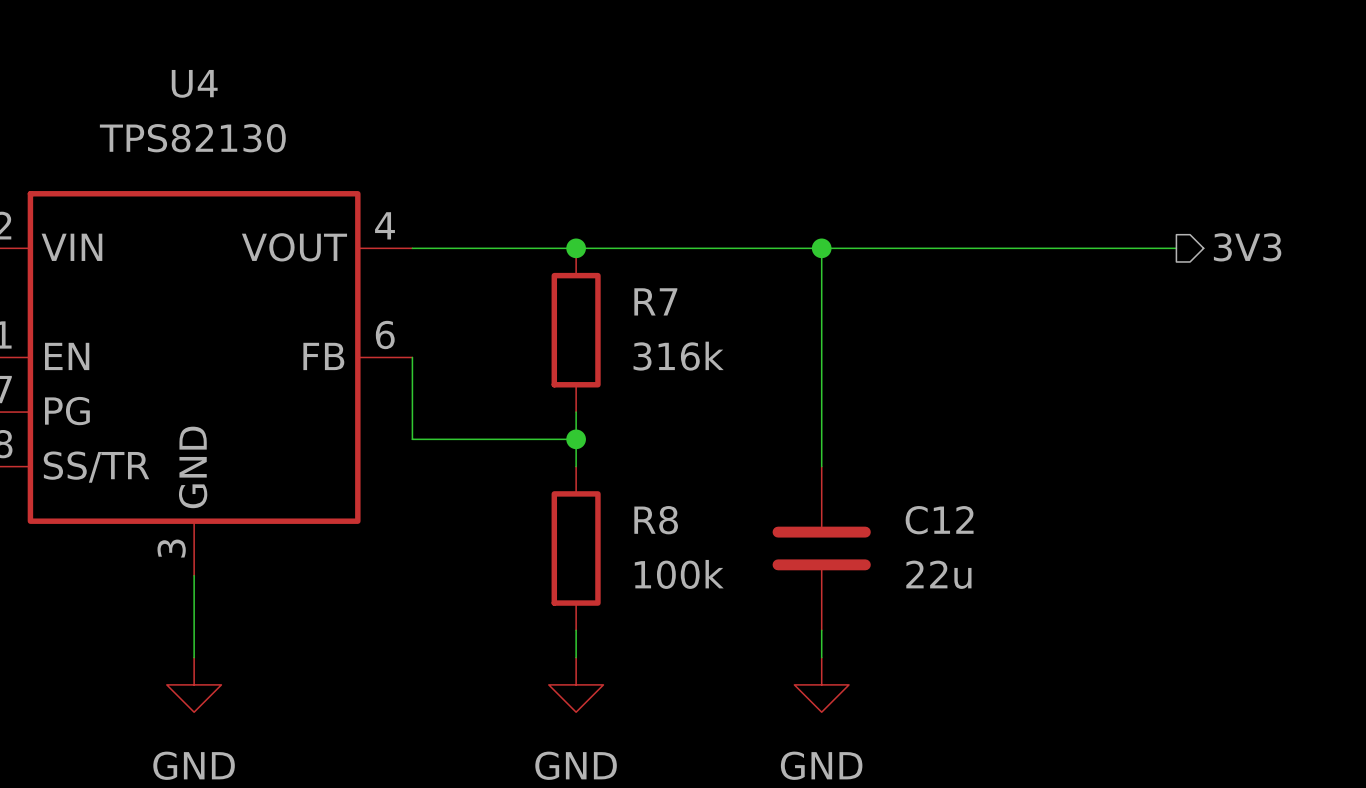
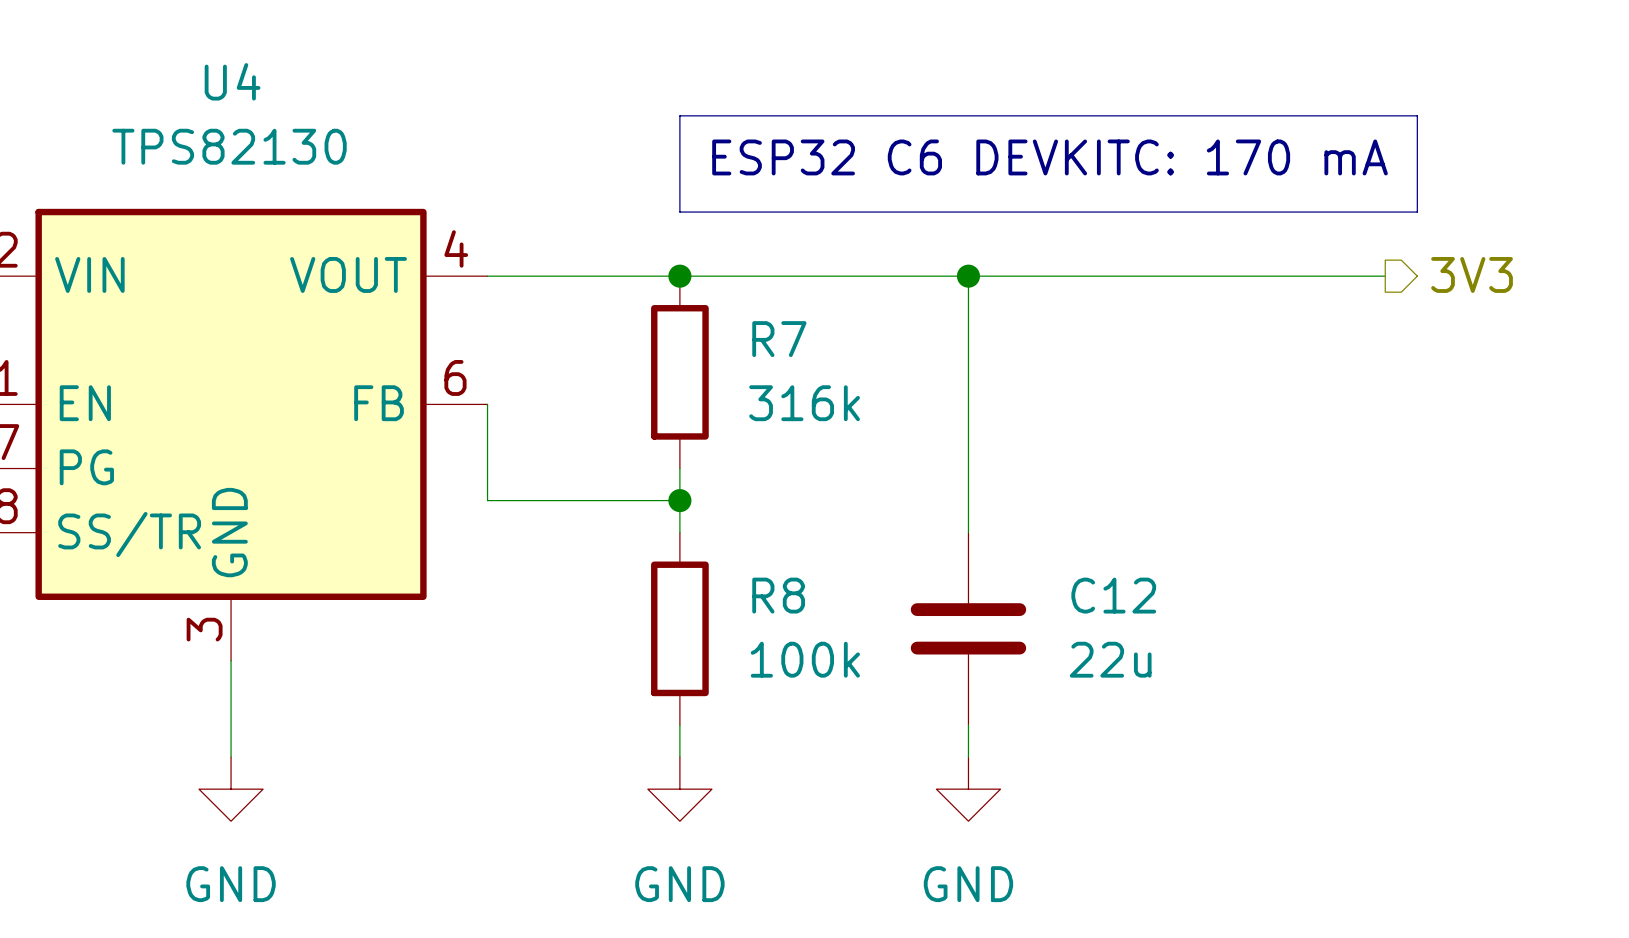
line: none -> (679, 115) (1417, 115) (1417, 212) (679, 212) (679, 115)
text: none -> ESP32 C6 DEVKITC: 170 mA (1050, 157)

